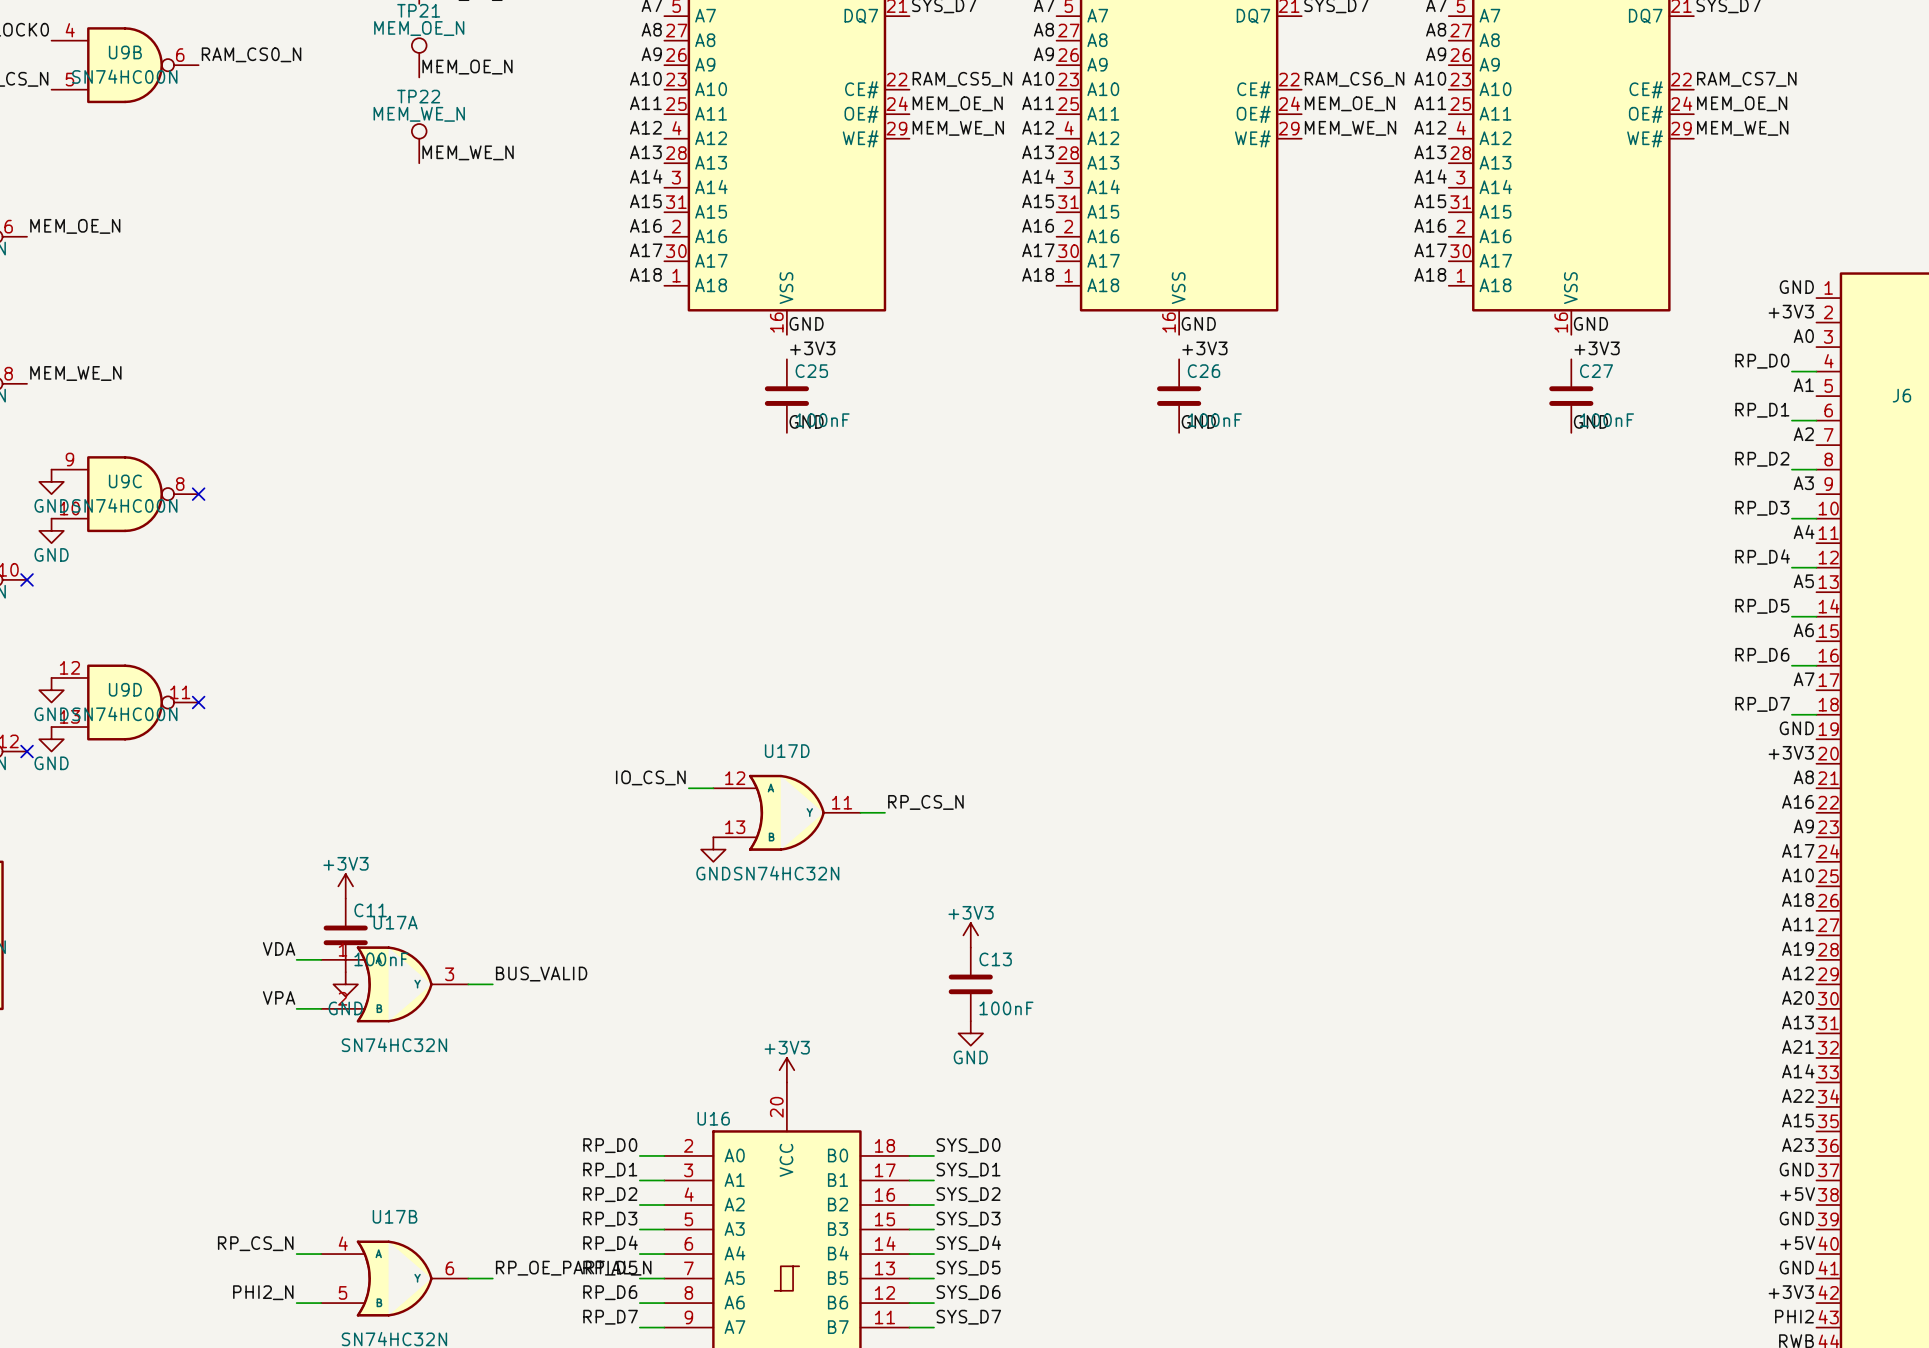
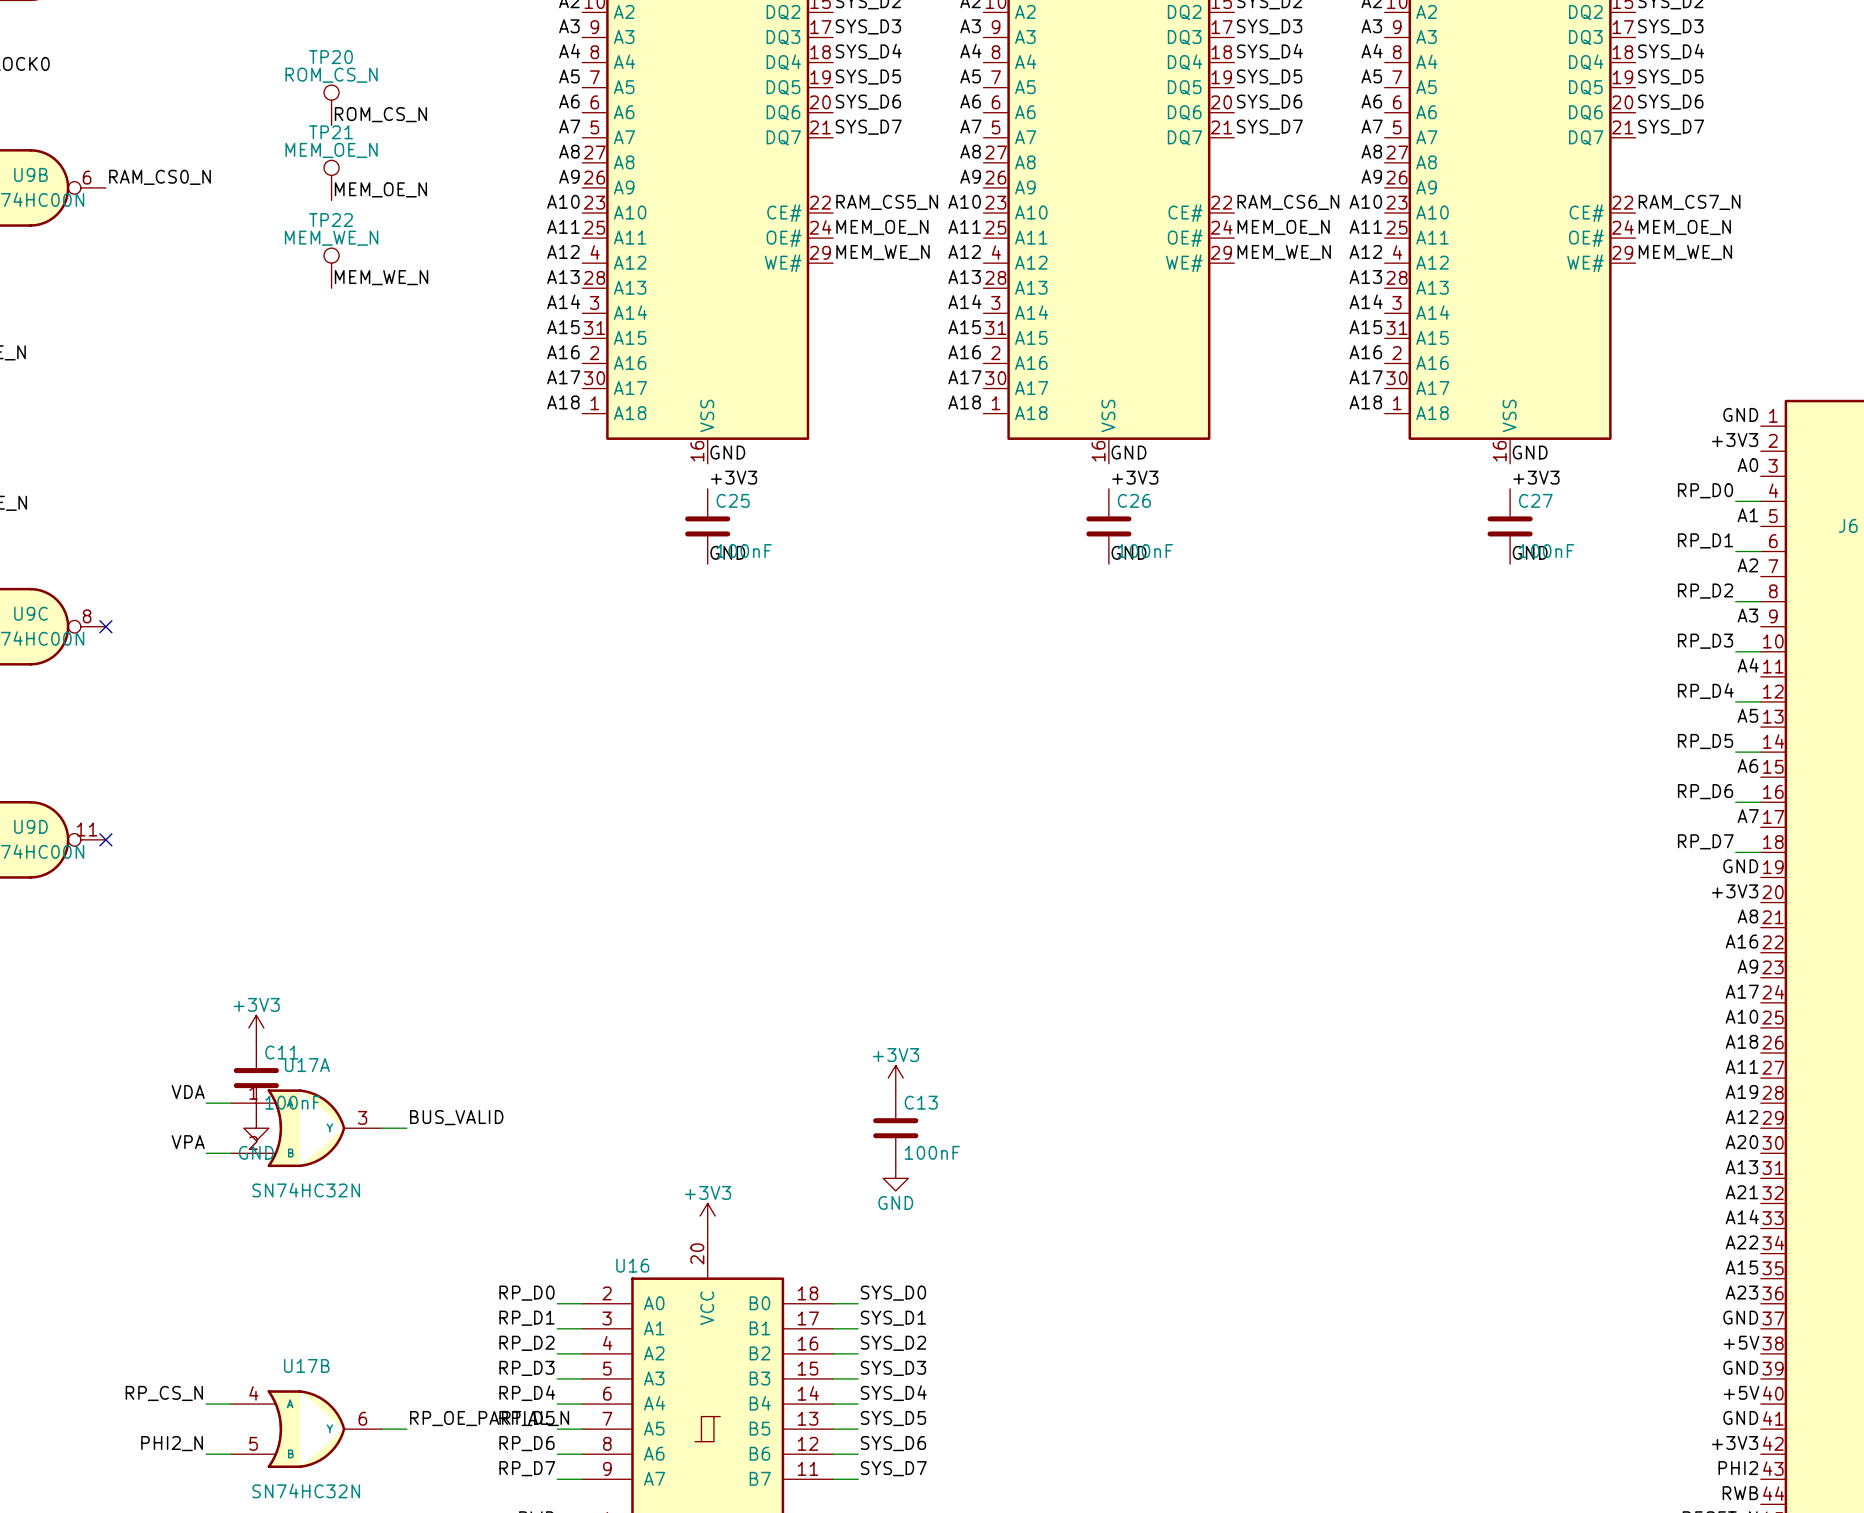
label: IO_CS_N (650, 777) -> none
wire: (688, 788) (713, 788) -> none
label: RP_CS_N (925, 802) -> none
U17D: SN74HC32N (786, 812) -> none
wire: (860, 812) (884, 812) -> none
power symbol: GND (713, 849) -> none

